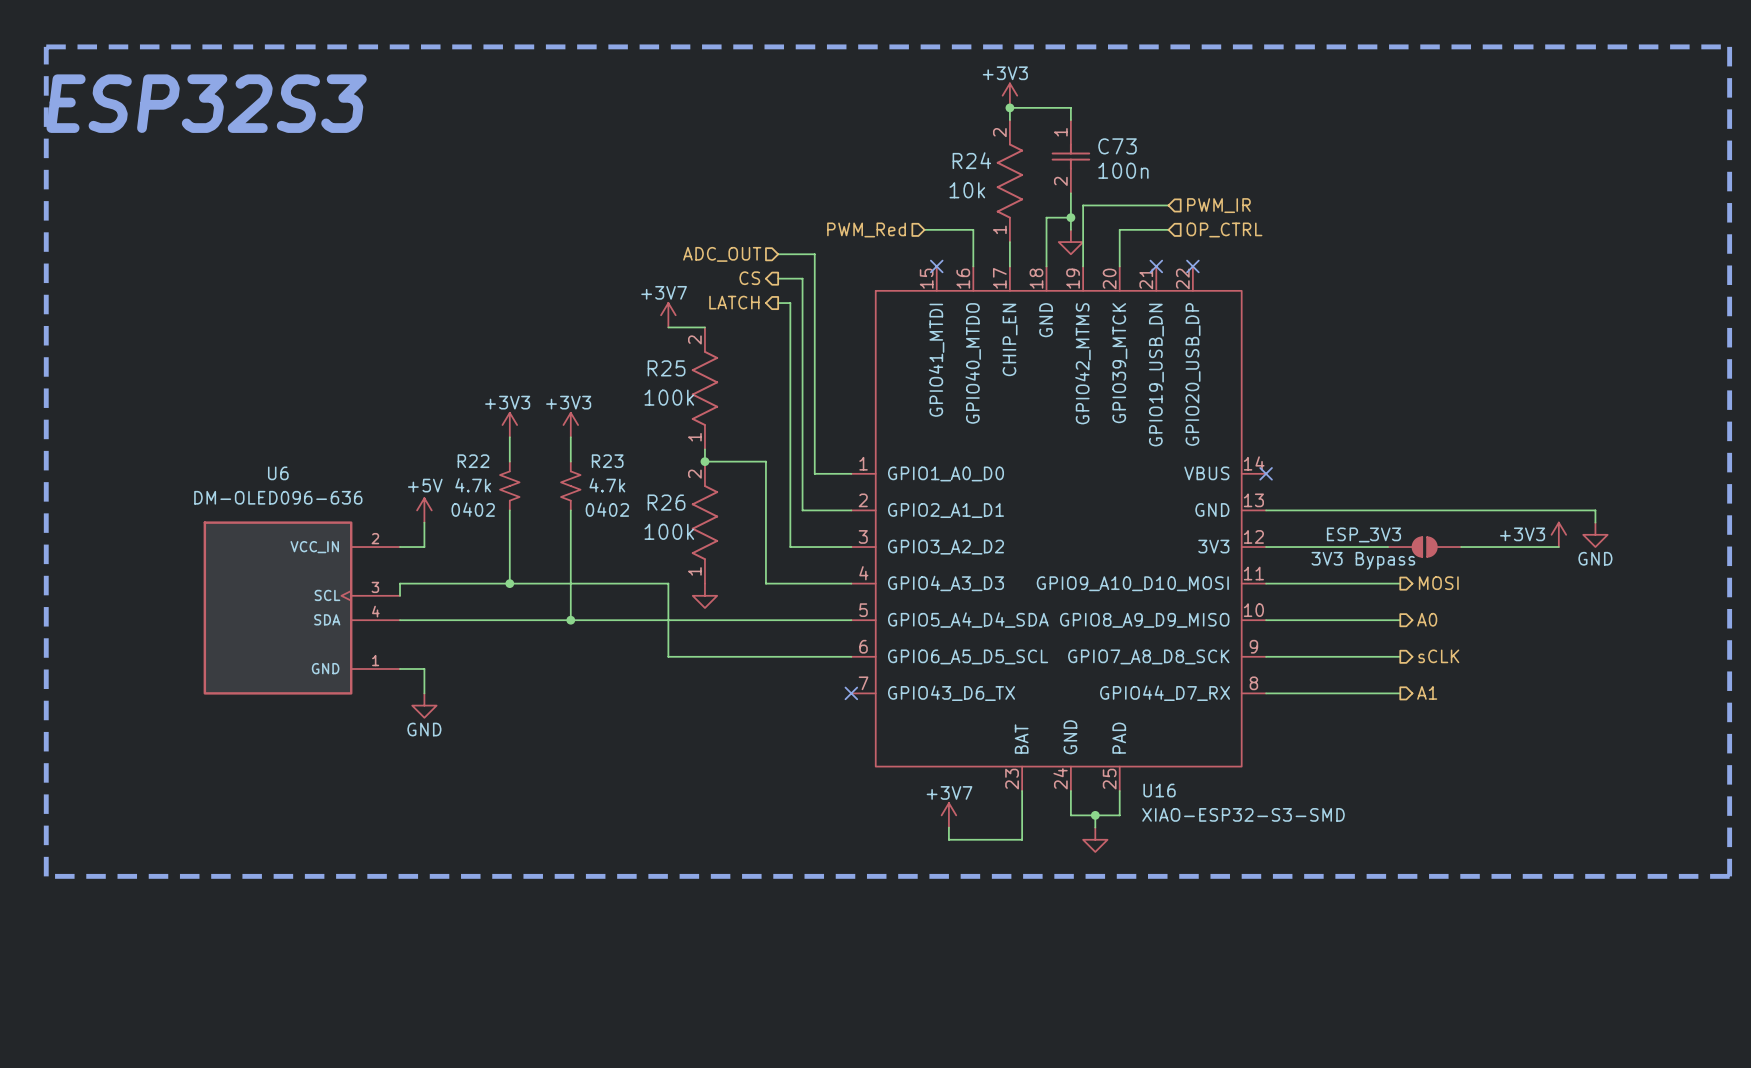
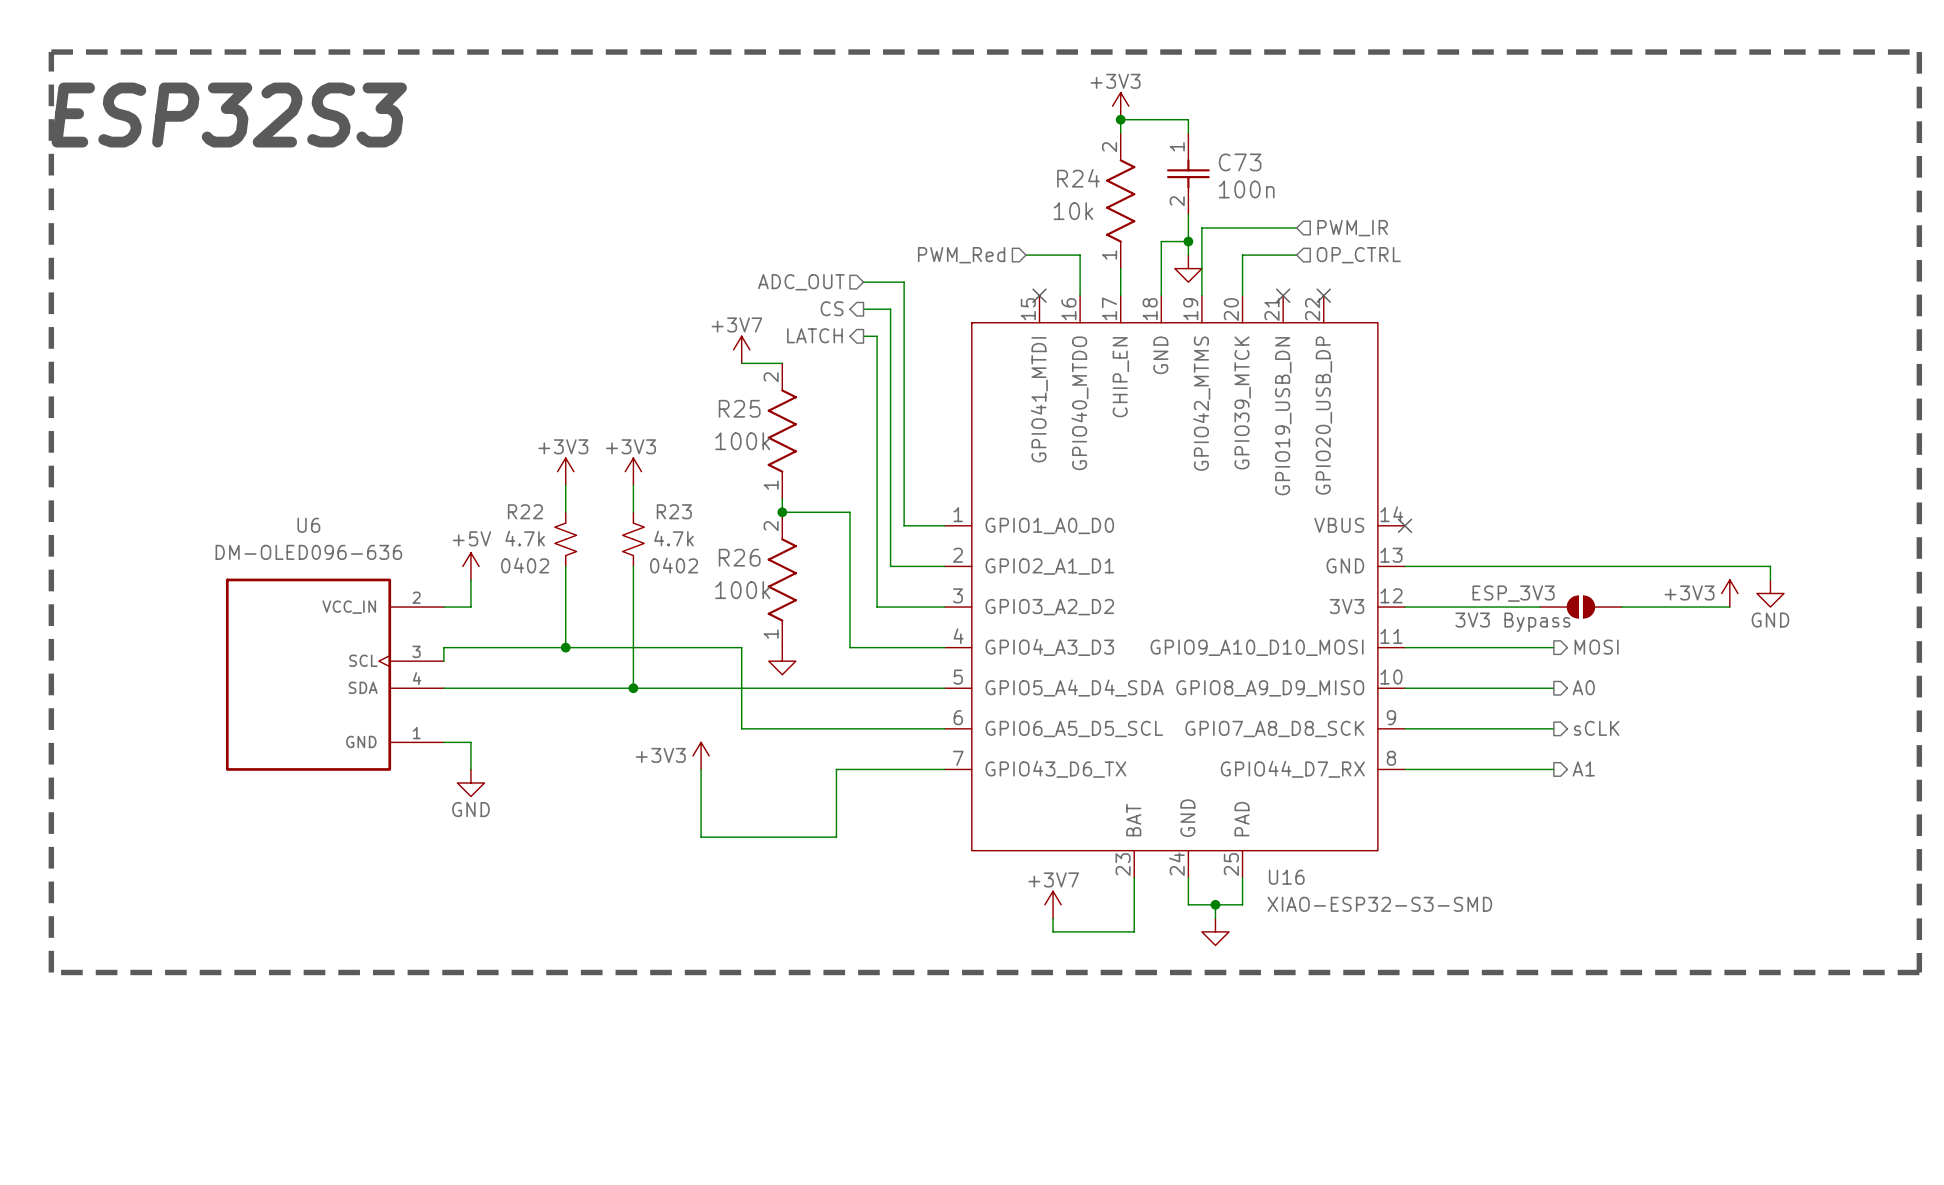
power symbol: none -> +3V3 (701, 755)
wire: none -> (701, 769) (701, 837) (836, 837) (836, 769) (944, 769)
no-connect mark: (851, 693) -> none

